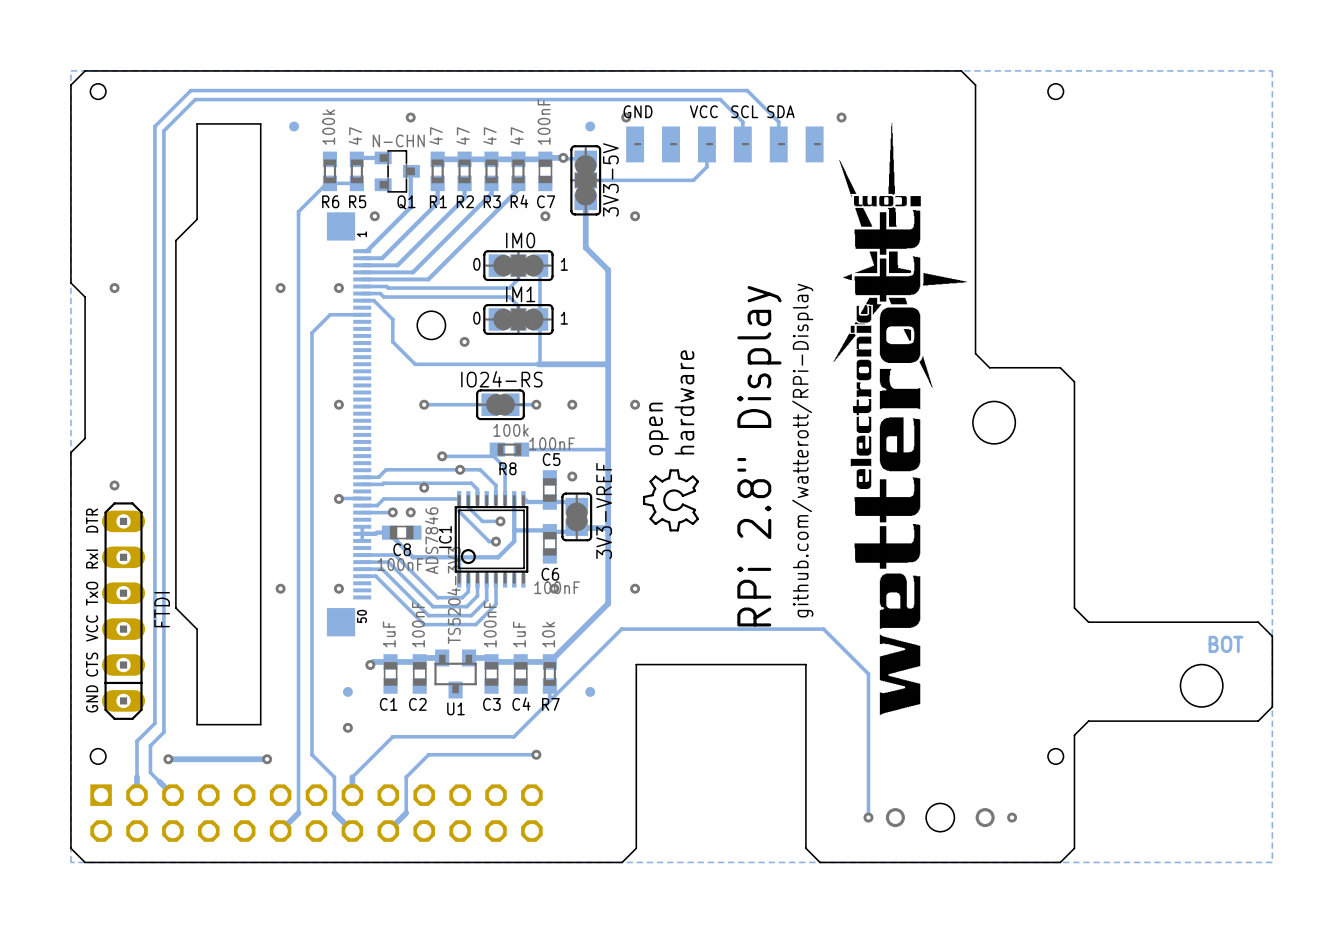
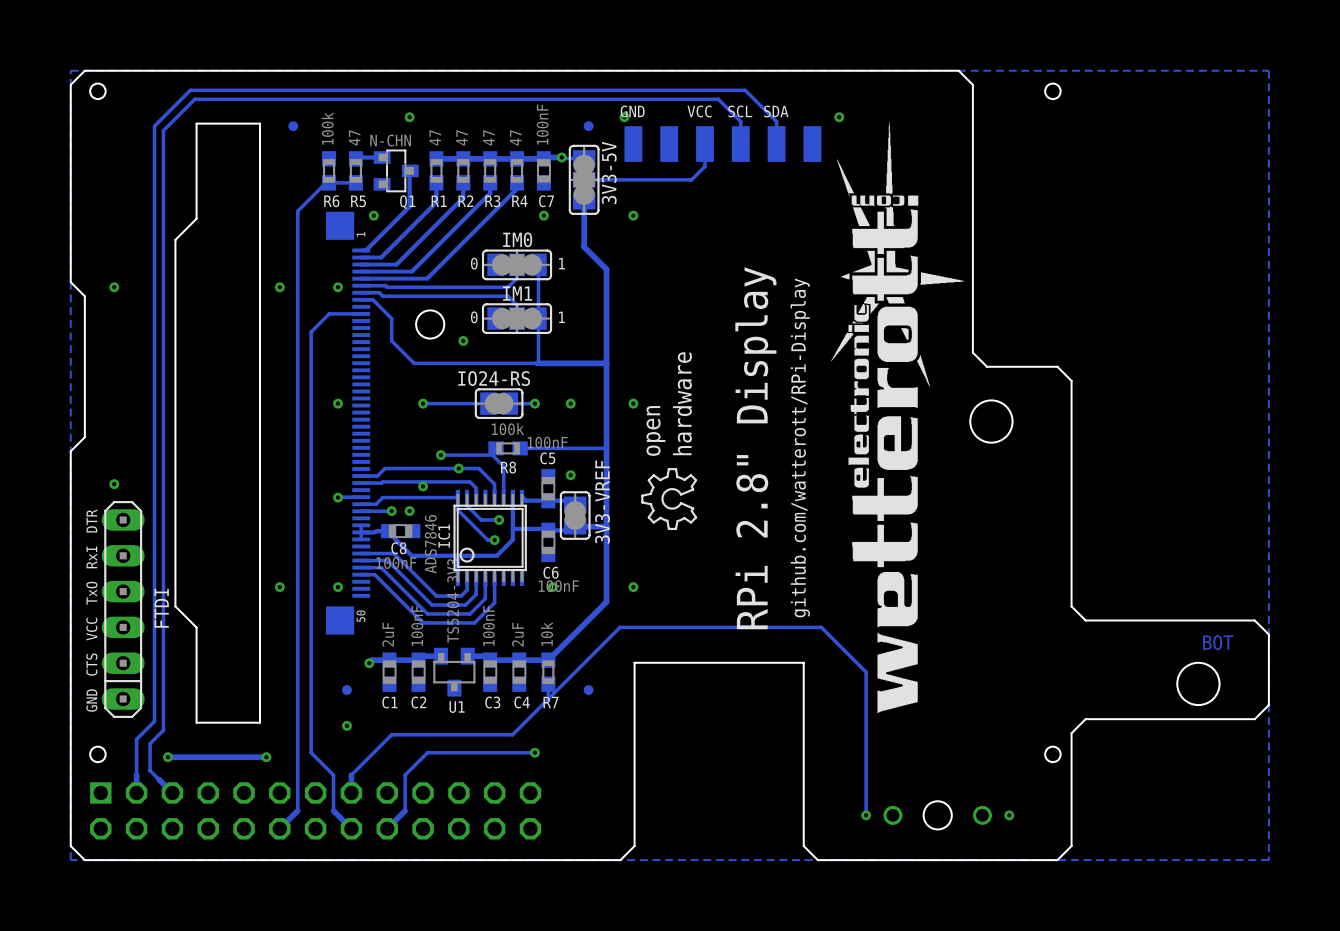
C1 value: 1uF (389, 634) -> 2uF (388, 634)
C4 value: 1uF (519, 634) -> 2uF (518, 634)

